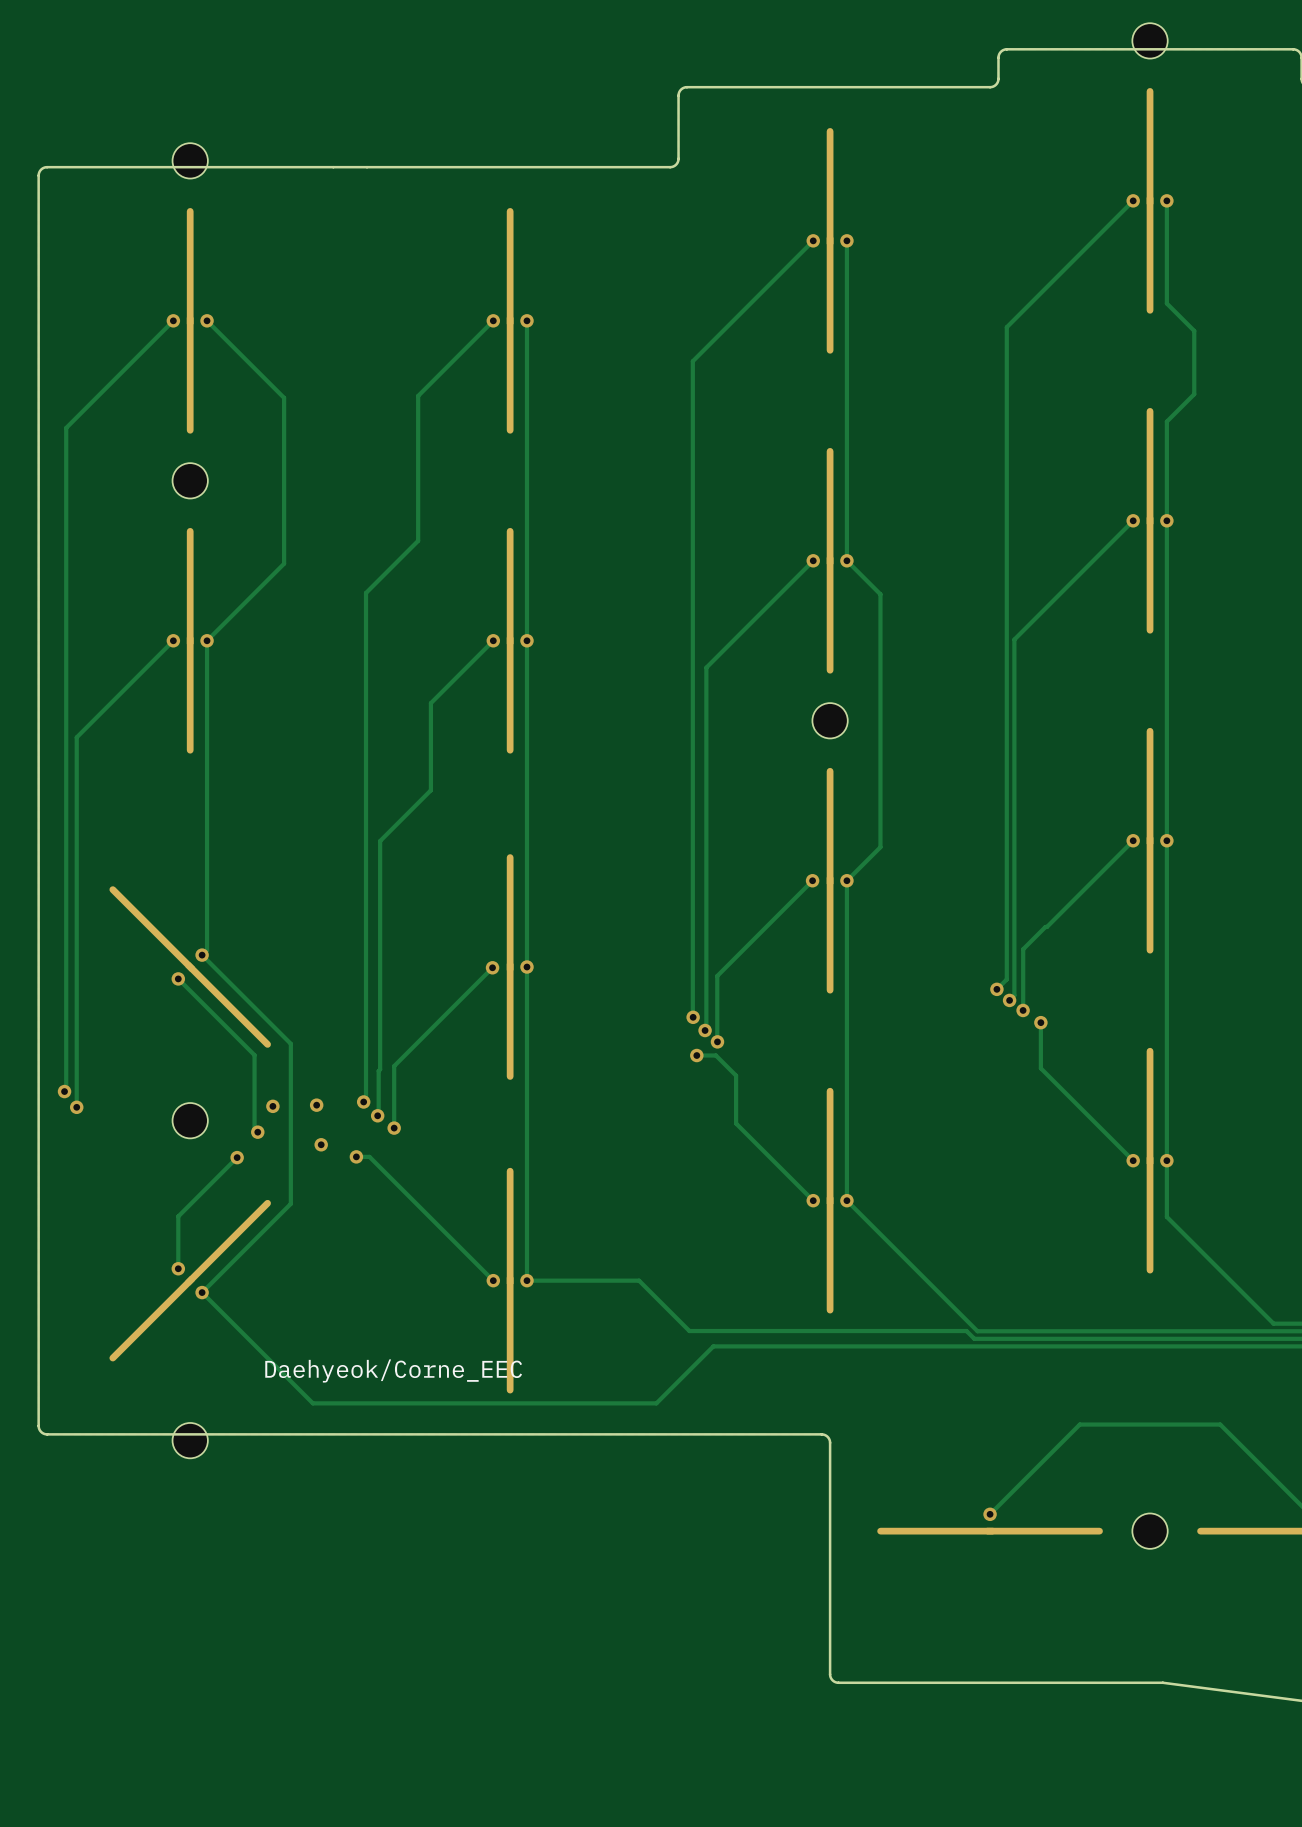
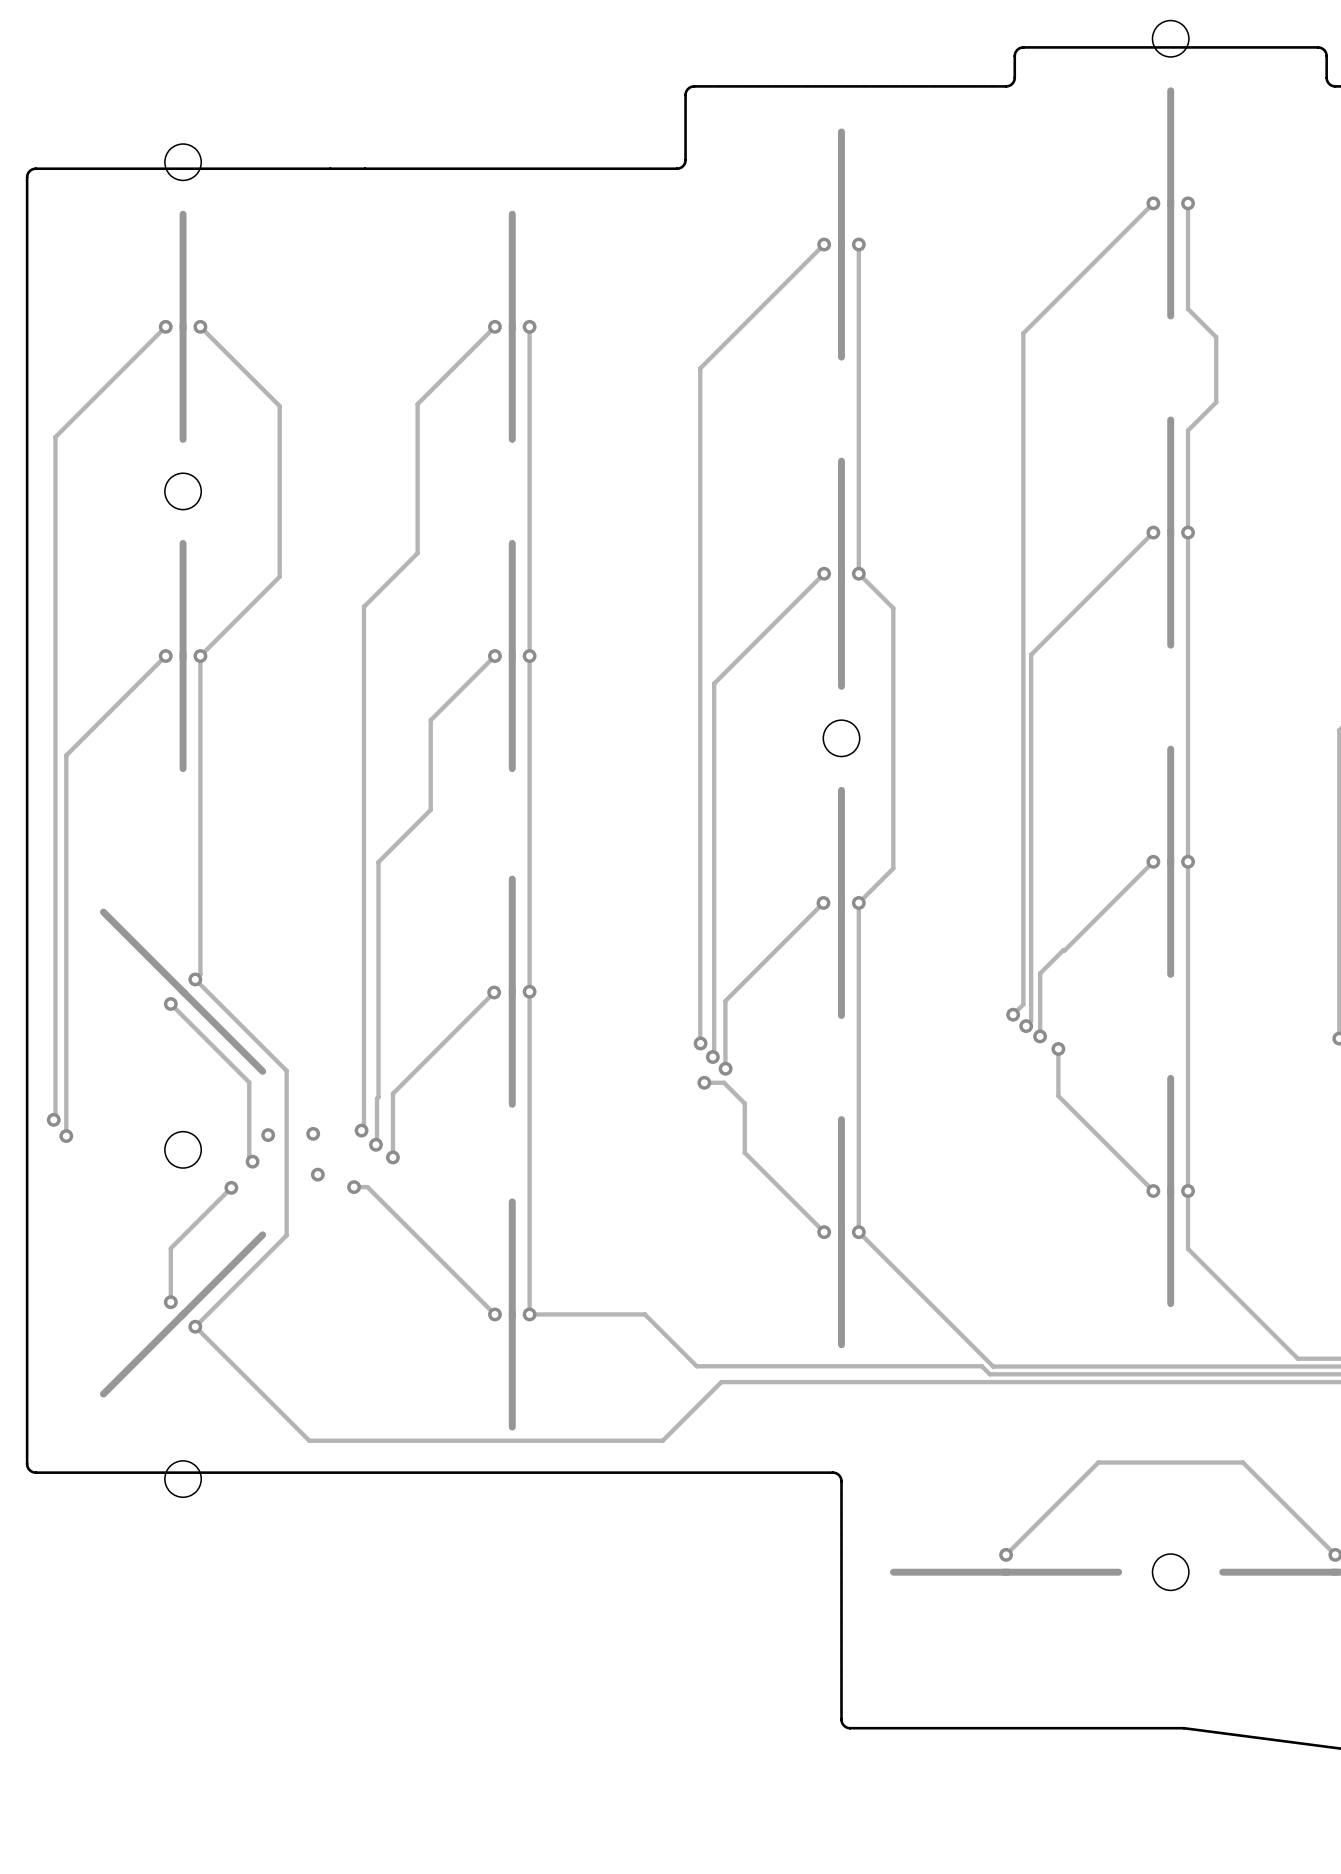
text: Daehyeok/Corne_EEC (393, 1370) -> none

